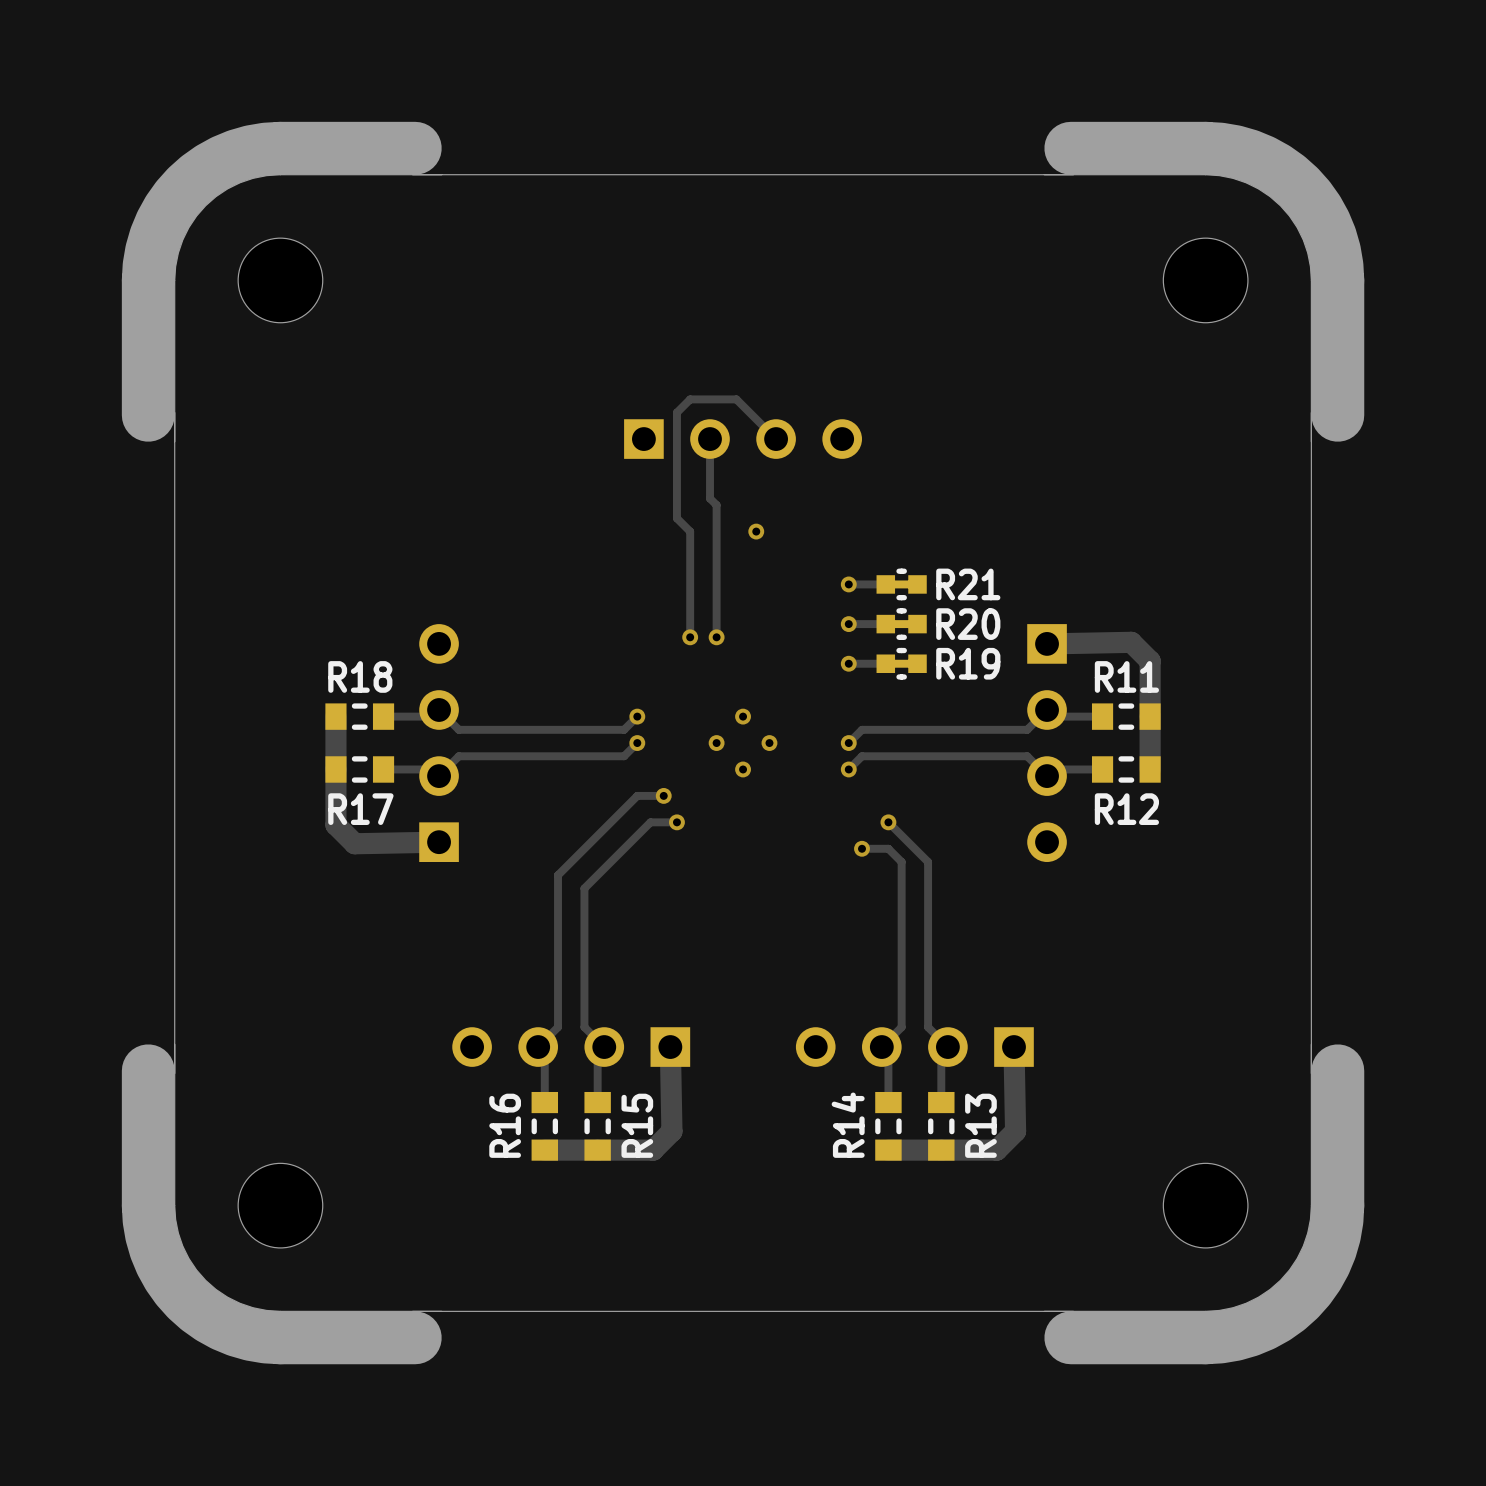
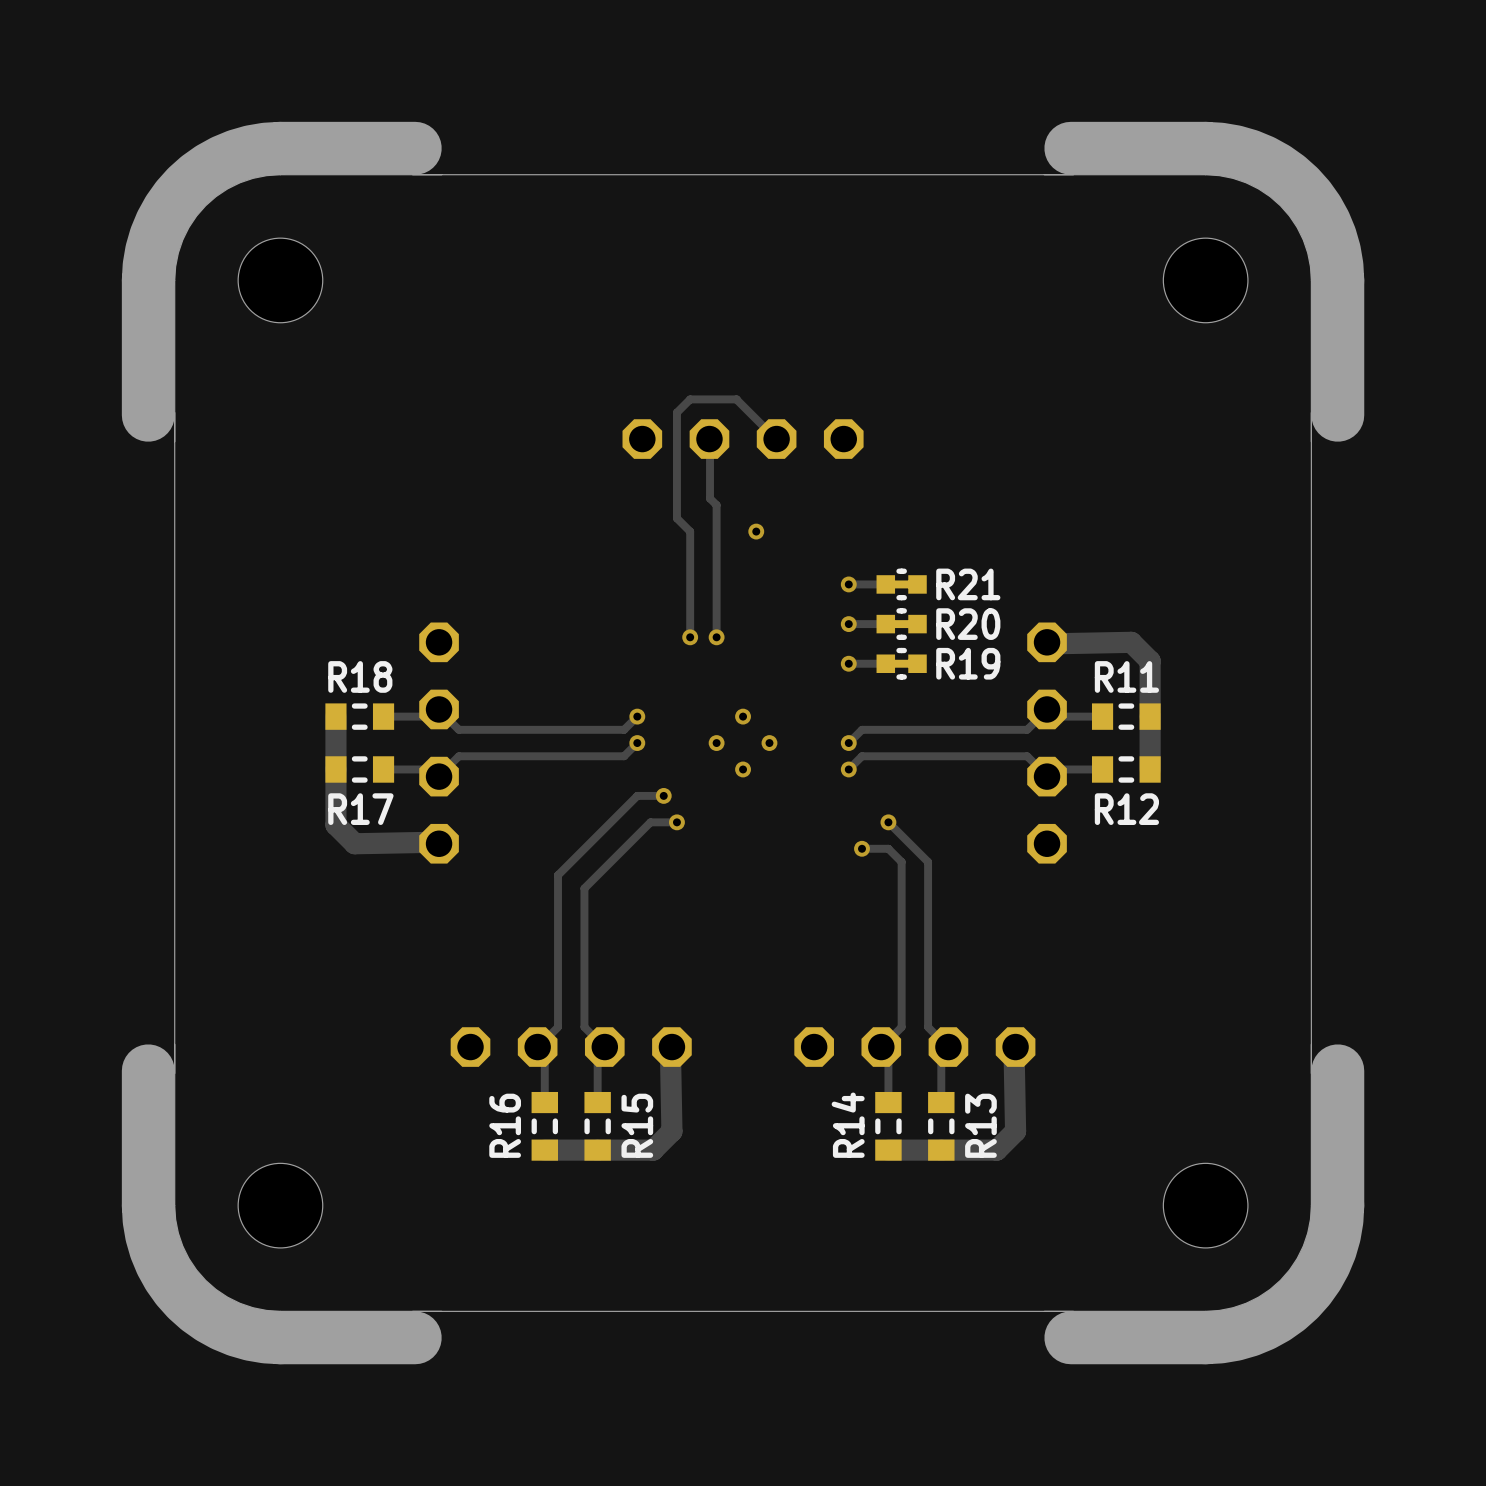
part footprint: [624, 419, 863, 459] -> [622, 419, 864, 459]
part footprint: [419, 624, 459, 863] -> [419, 622, 459, 864]
part footprint: [1027, 624, 1067, 863] -> [1027, 622, 1067, 864]
part footprint: [452, 1027, 691, 1067] -> [450, 1027, 692, 1067]
part footprint: [795, 1027, 1034, 1067] -> [794, 1027, 1036, 1067]

